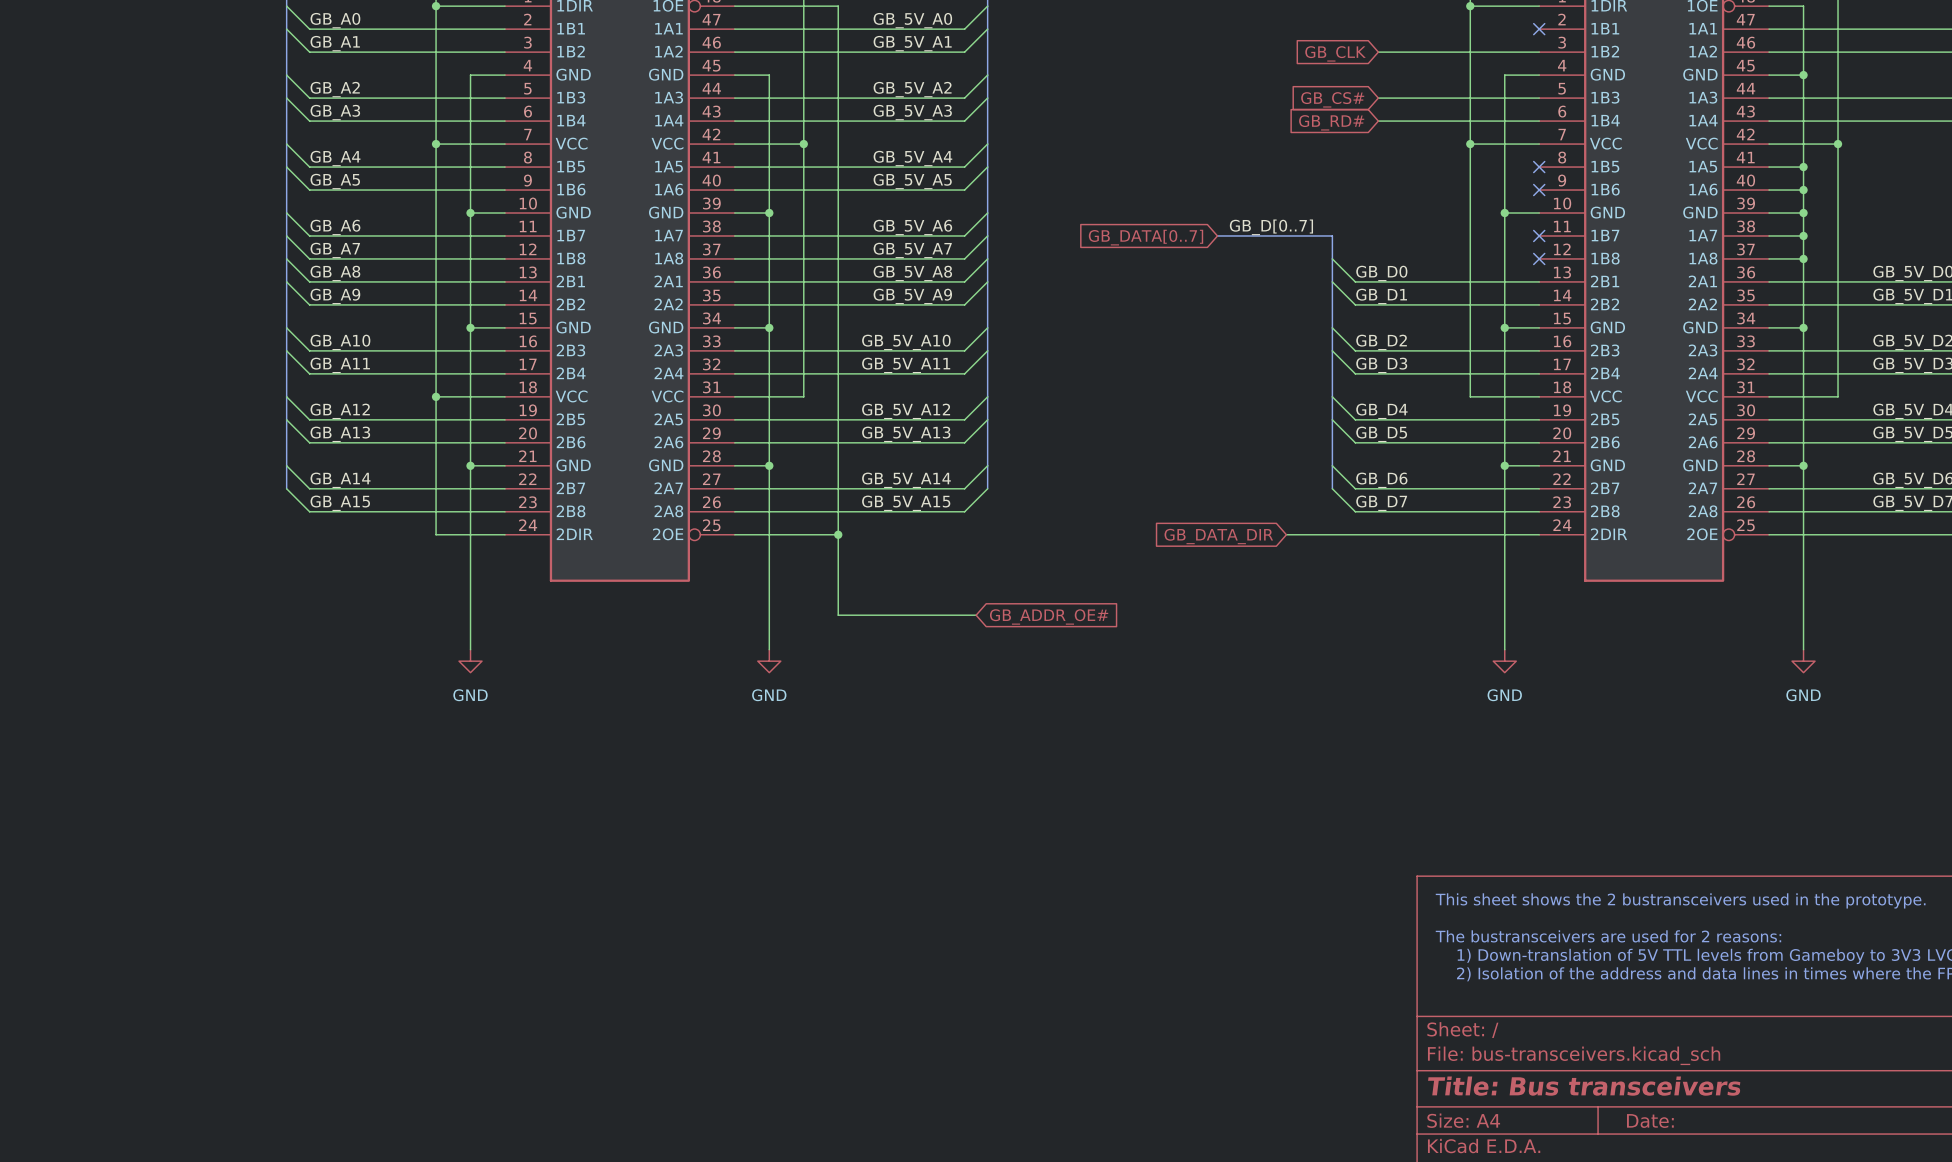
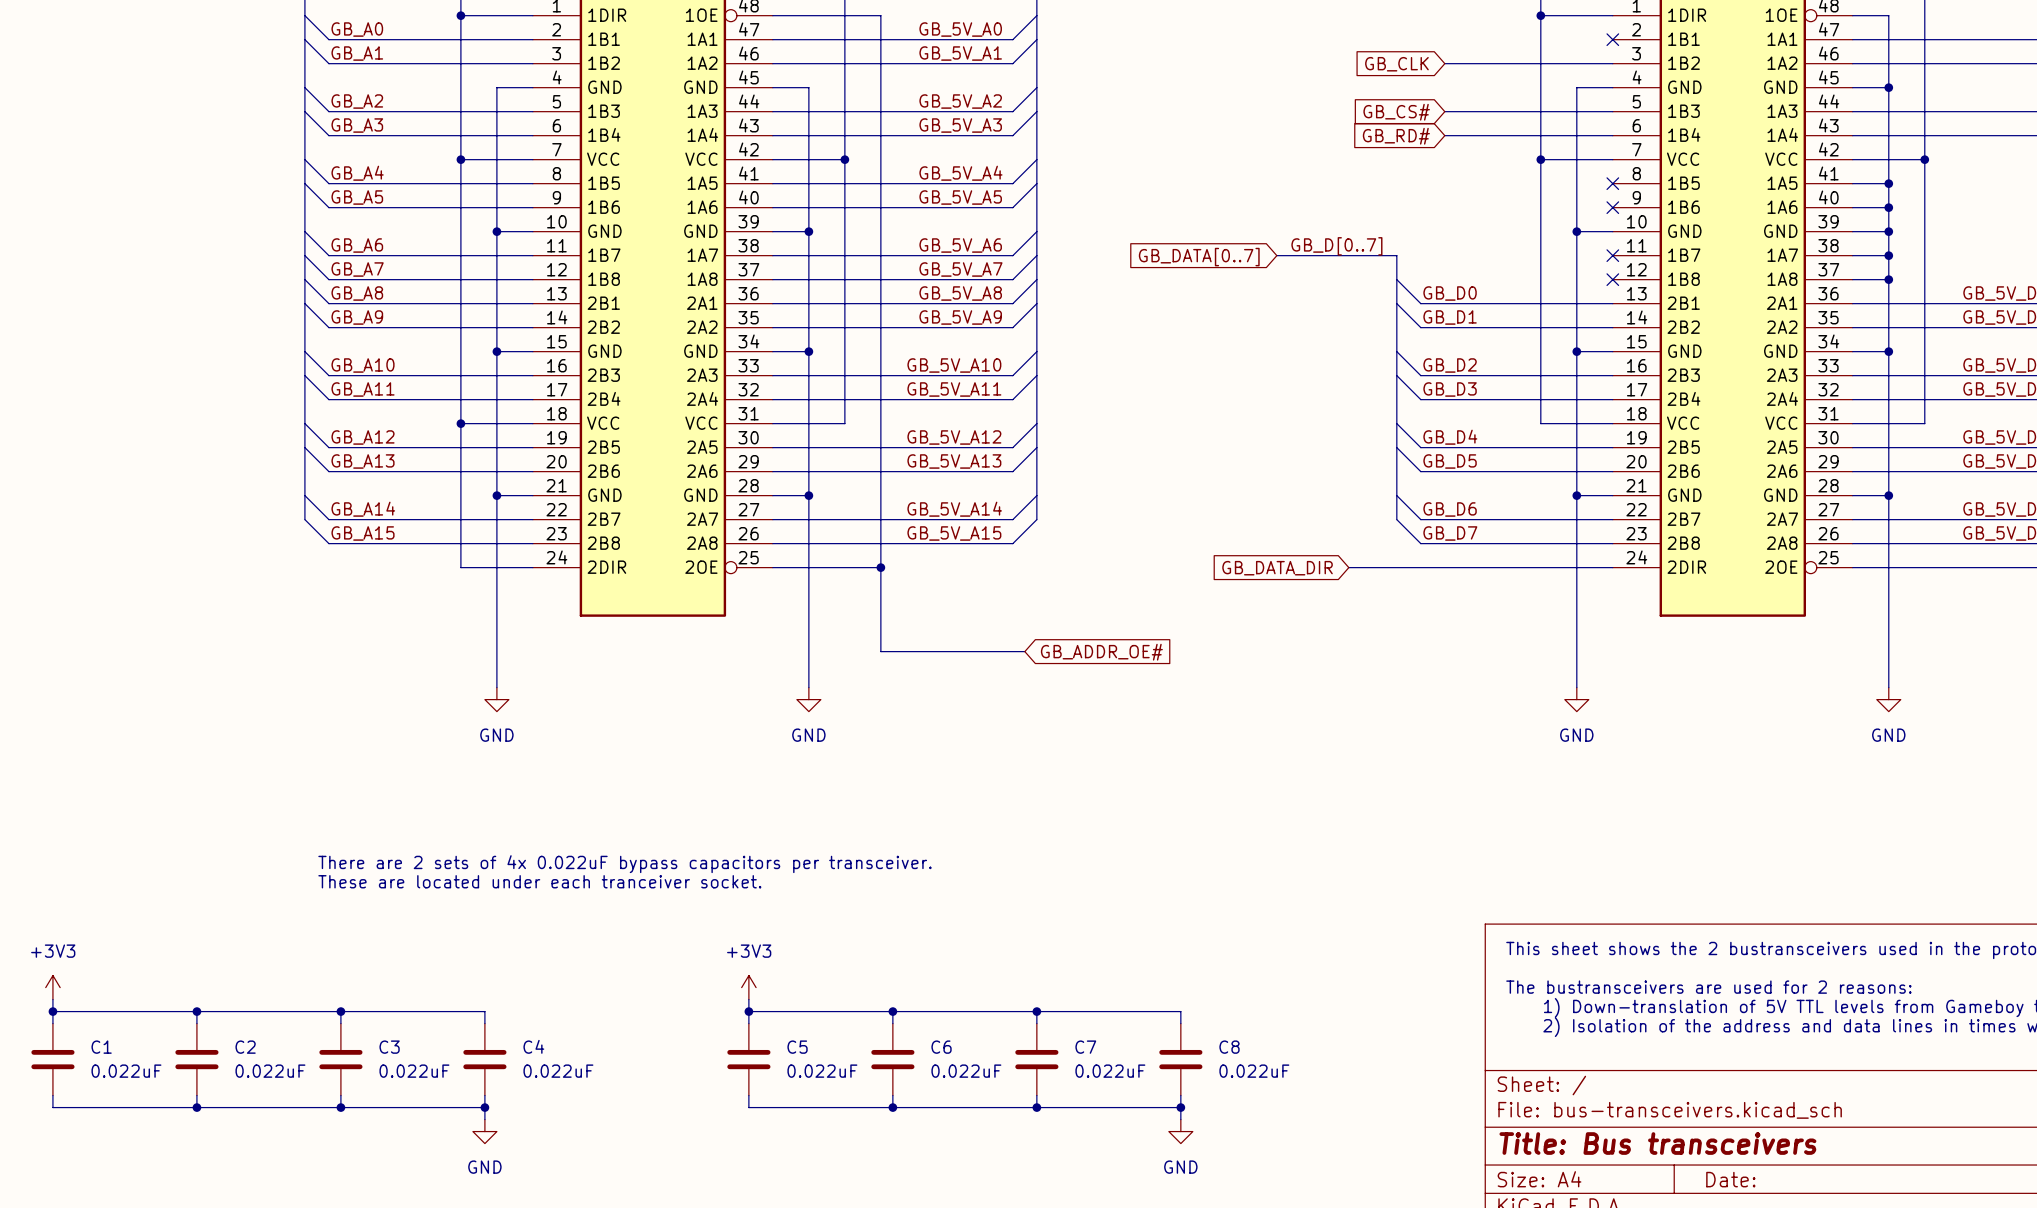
text: none -> There are 2 sets of 4x 0.022uF bypass capacitors per transceiver. (624, 864)
text: none -> These are located under each tranceiver socket. (539, 881)
power symbol: none -> +3V3 (52, 987)
power symbol: none -> +3V3 (748, 987)
wire: none -> (52, 999) (52, 1023)
wire: none -> (748, 999) (748, 1023)
wire: none -> (52, 1011) (484, 1011) (484, 1023)
junction: none -> (52, 1011)
wire: none -> (196, 1011) (196, 1023)
junction: none -> (196, 1011)
wire: none -> (340, 1011) (340, 1023)
junction: none -> (340, 1011)
wire: none -> (748, 1011) (1180, 1011) (1180, 1023)
junction: none -> (748, 1011)
wire: none -> (892, 1011) (892, 1023)
junction: none -> (892, 1011)
wire: none -> (1036, 1011) (1036, 1023)
junction: none -> (1036, 1011)
C1: none -> 0.022uF (52, 1059)
C2: none -> 0.022uF (196, 1059)
C3: none -> 0.022uF (340, 1059)
C4: none -> 0.022uF (484, 1059)
C5: none -> 0.022uF (748, 1059)
C6: none -> 0.022uF (892, 1059)
C7: none -> 0.022uF (1036, 1059)
C8: none -> 0.022uF (1180, 1059)
wire: none -> (52, 1095) (52, 1107) (484, 1107)
wire: none -> (196, 1095) (196, 1107)
wire: none -> (340, 1095) (340, 1107)
wire: none -> (484, 1095) (484, 1119)
wire: none -> (748, 1095) (748, 1107) (1180, 1107)
wire: none -> (892, 1095) (892, 1107)
wire: none -> (1036, 1095) (1036, 1107)
wire: none -> (1180, 1095) (1180, 1119)
junction: none -> (196, 1107)
junction: none -> (340, 1107)
junction: none -> (484, 1107)
junction: none -> (892, 1107)
junction: none -> (1036, 1107)
junction: none -> (1180, 1107)
power symbol: none -> GND (484, 1131)
power symbol: none -> GND (1180, 1131)

